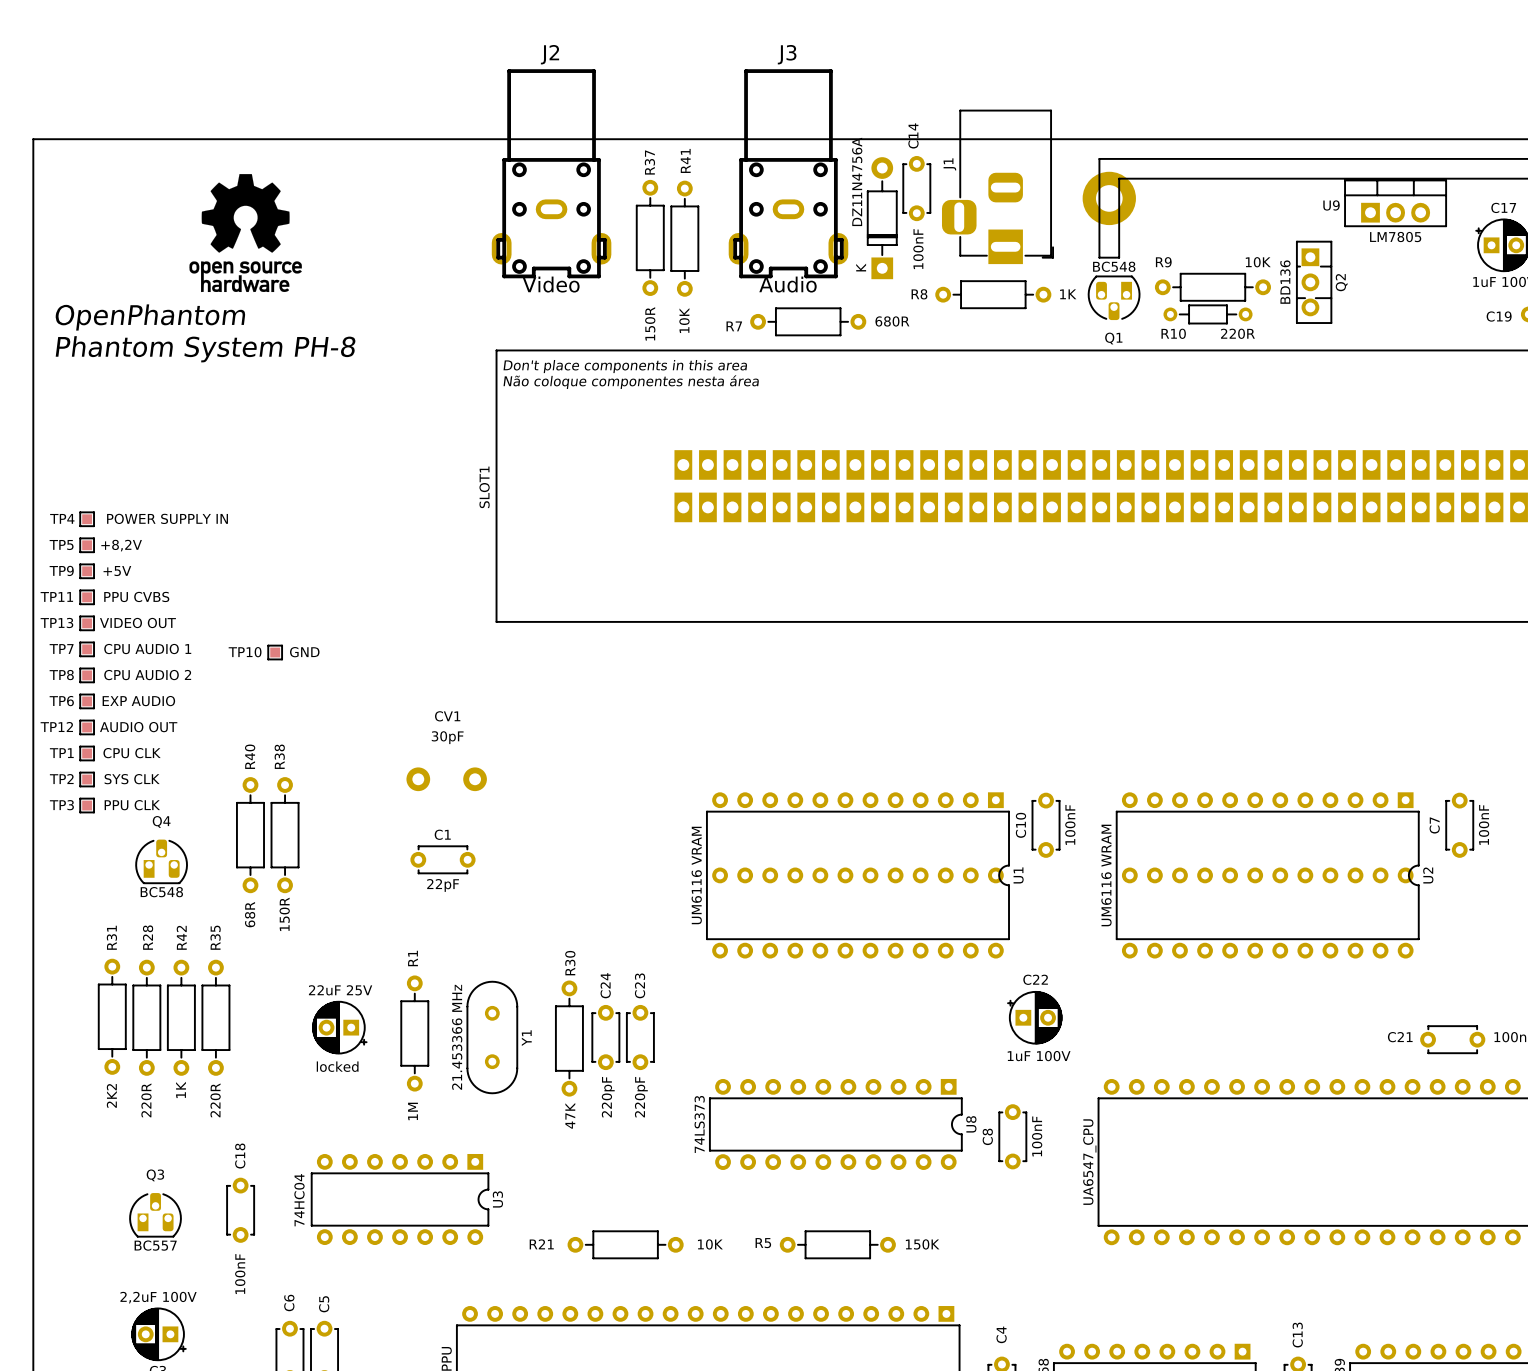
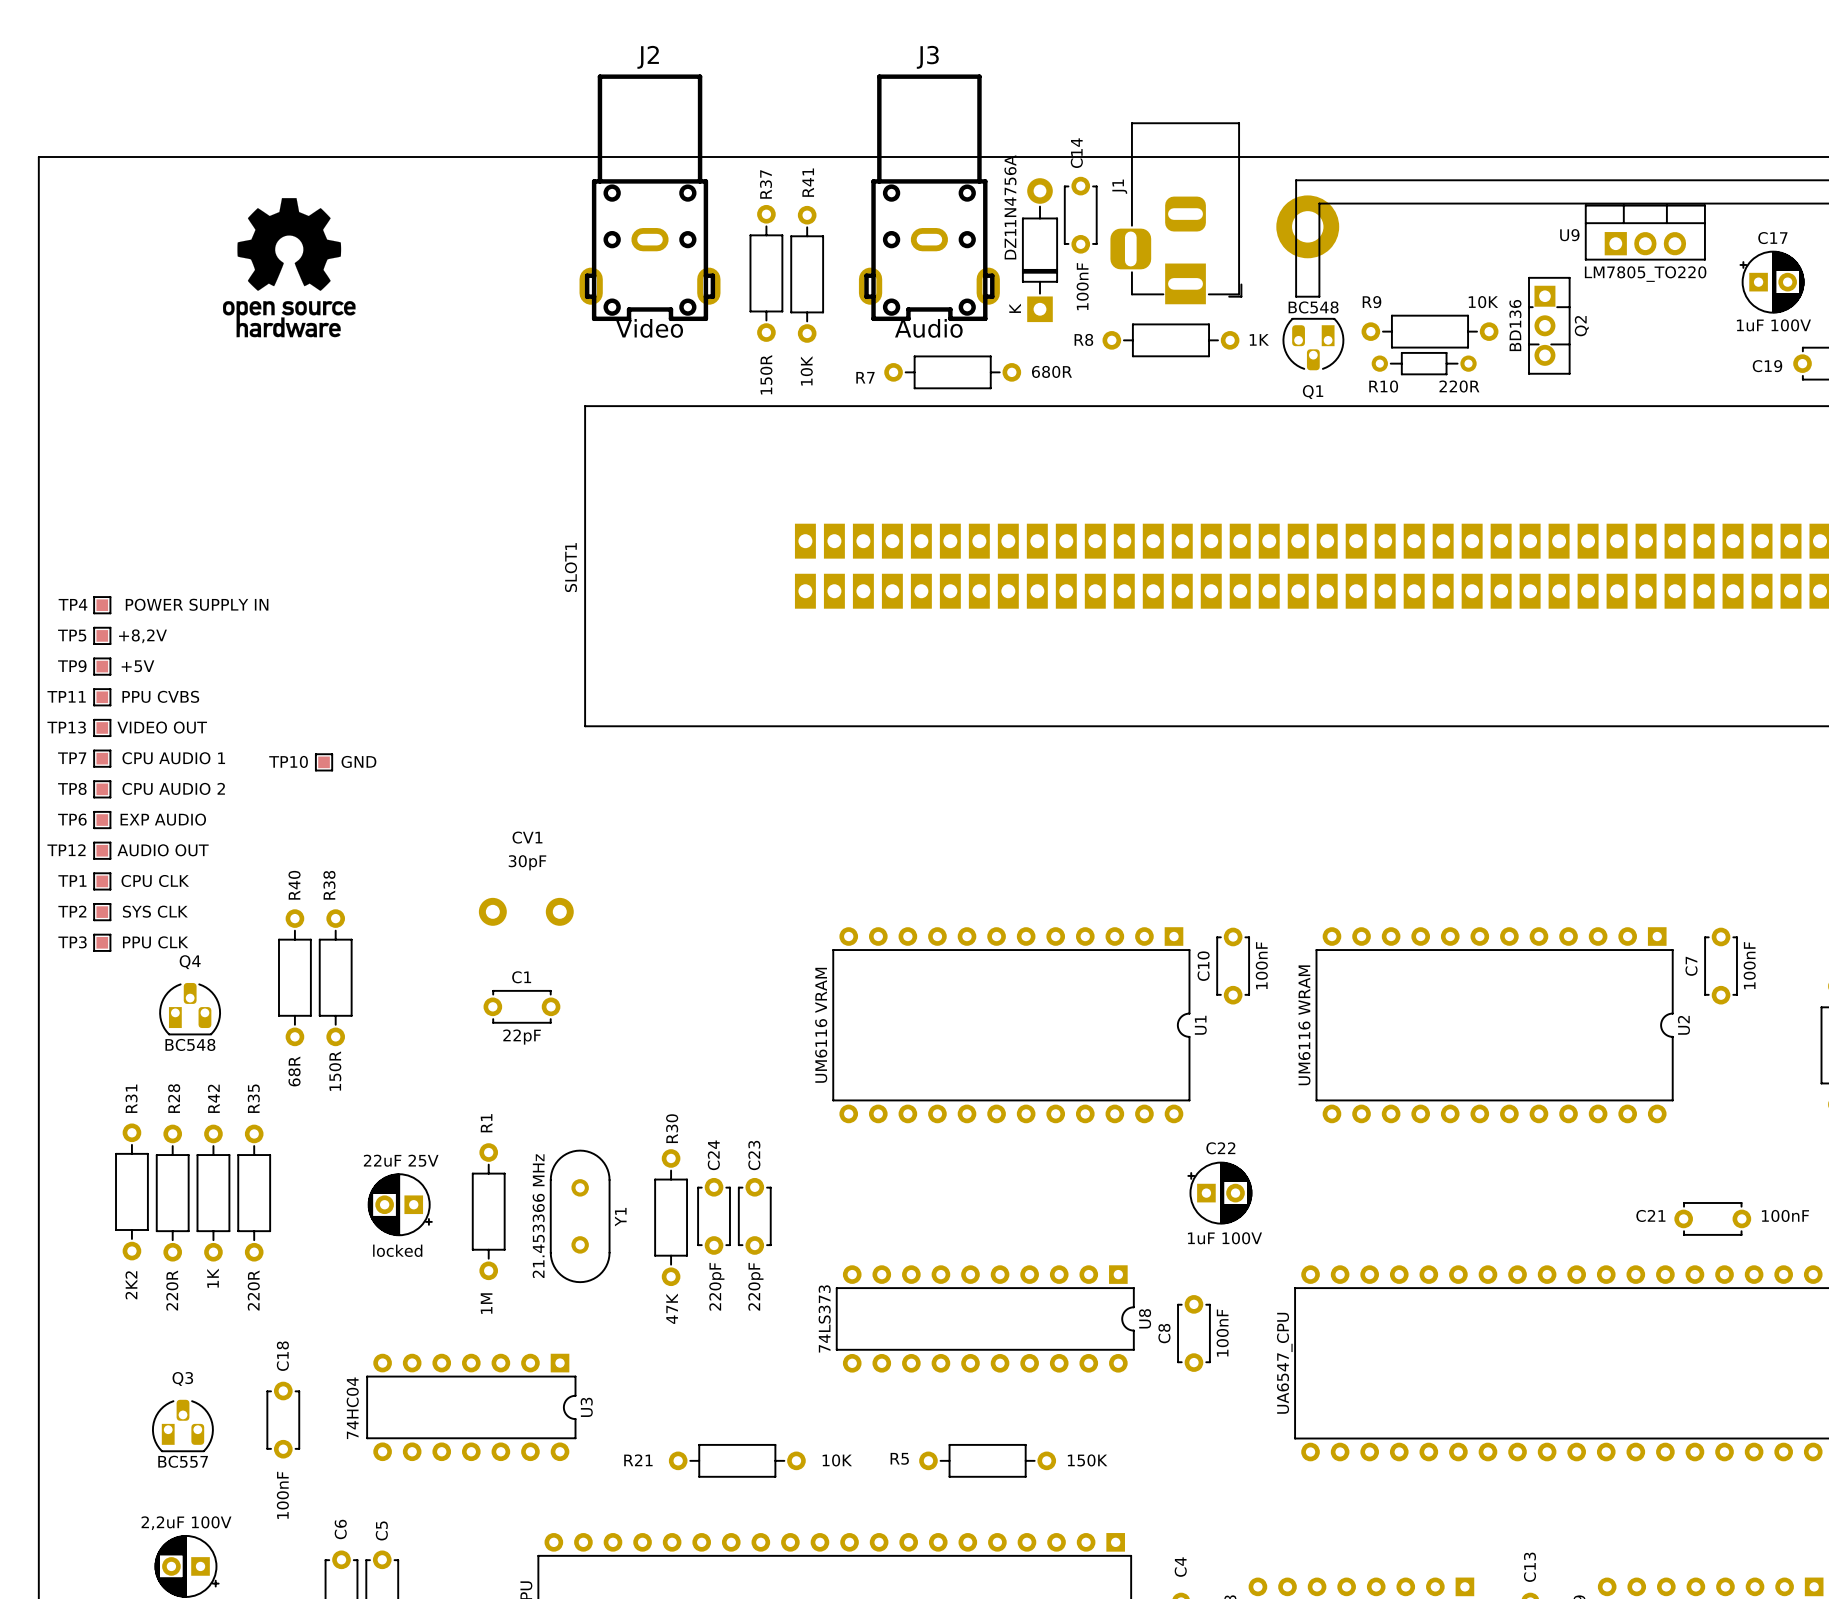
U9 value: LM7805 (1395, 237) -> LM7805_TO220 (1645, 274)
text: OpenPhantom (150, 317) -> none
text: Phantom System PH-8 (205, 349) -> none
text: Don't place components in this area (625, 366) -> none
text: Não coloque componentes nesta área (631, 382) -> none
U1 footprint: [706, 792, 1010, 959] -> [832, 927, 1191, 1124]
U2 footprint: [1116, 792, 1420, 959] -> [1315, 927, 1674, 1124]

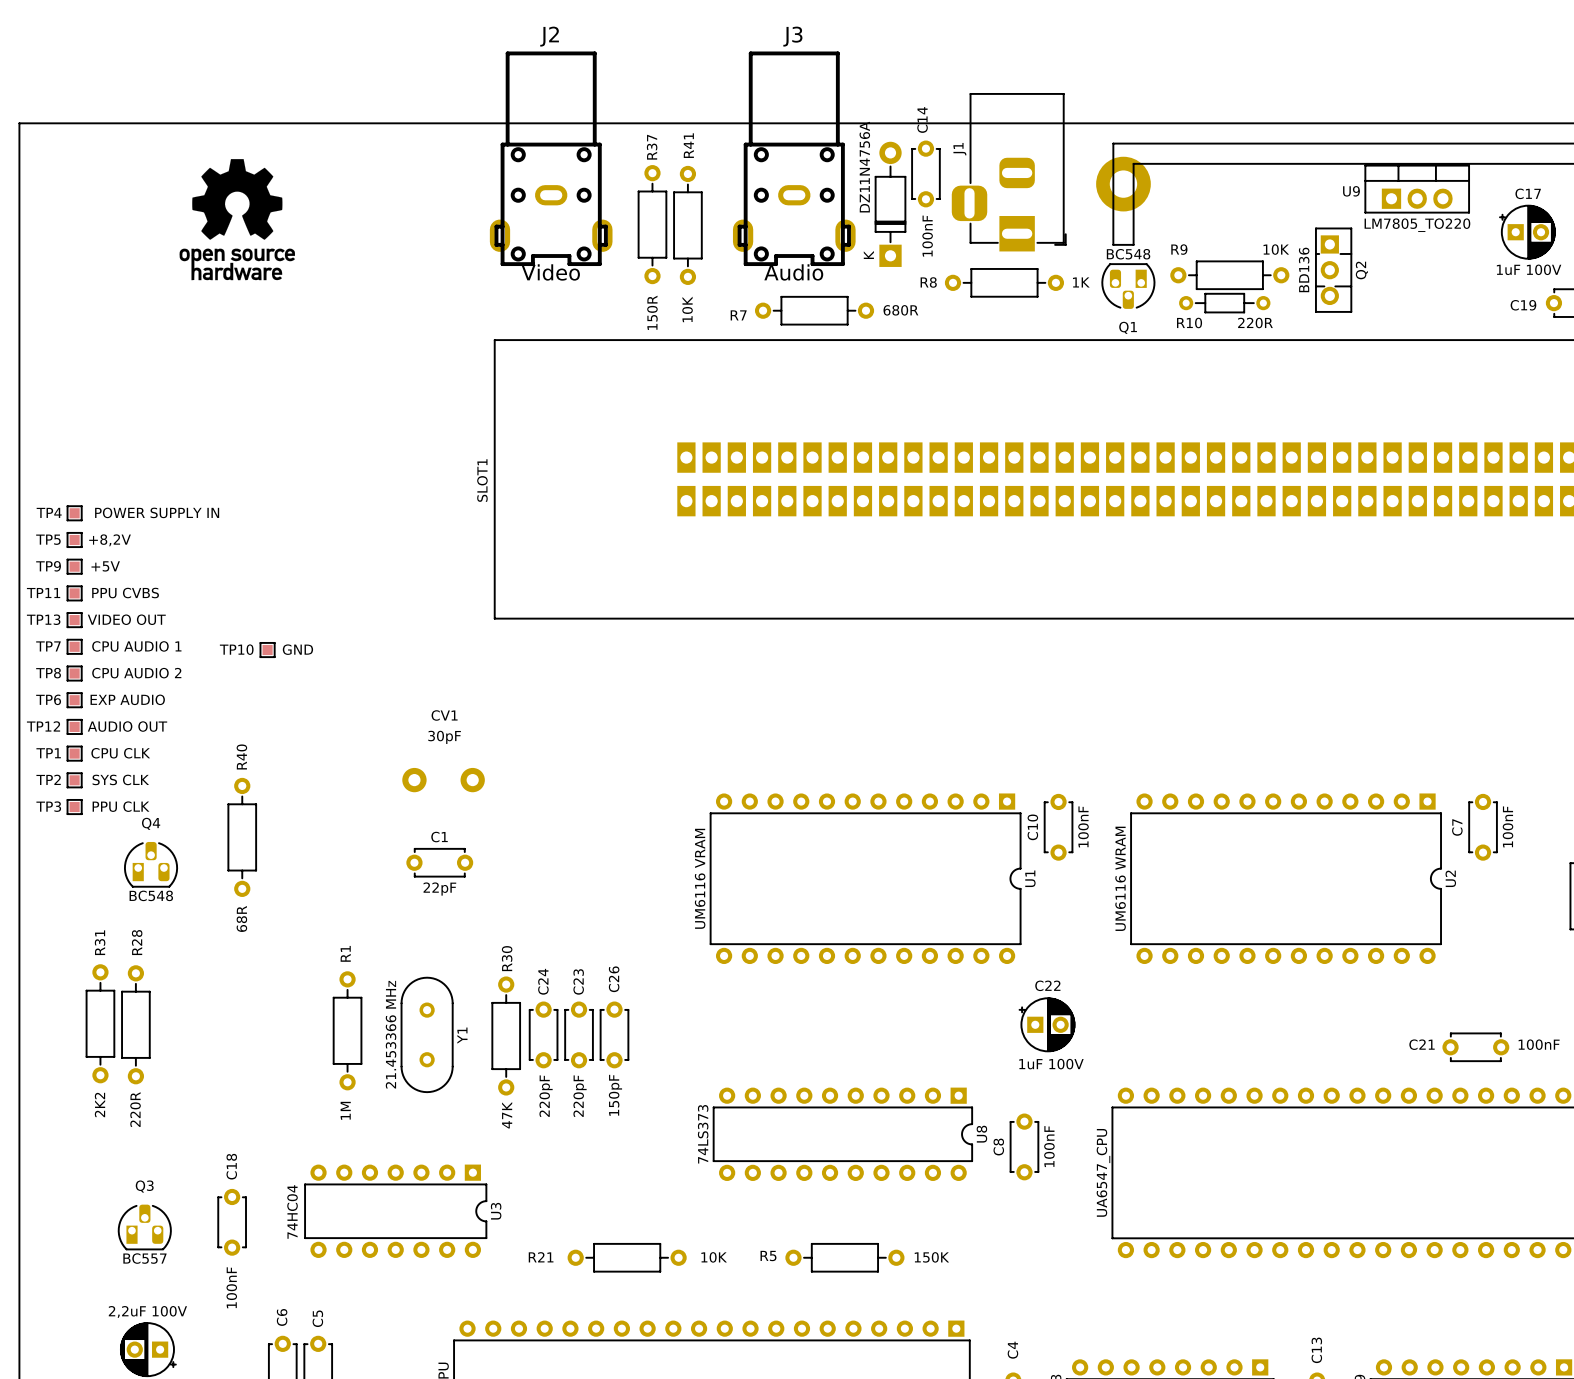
R38: 150R (335, 977) -> none
R42: 1K (213, 1193) -> none
R35: 220R (254, 1193) -> none
locked: 22uF 25V (400, 1204) -> none
C26: none -> 150pF (614, 1034)
R1 position: (488, 1211) -> (347, 1030)
Y1 position: (580, 1216) -> (427, 1034)
C24 position: (714, 1216) -> (543, 1034)
C23 position: (754, 1216) -> (579, 1034)
R30 position: (671, 1217) -> (506, 1036)

